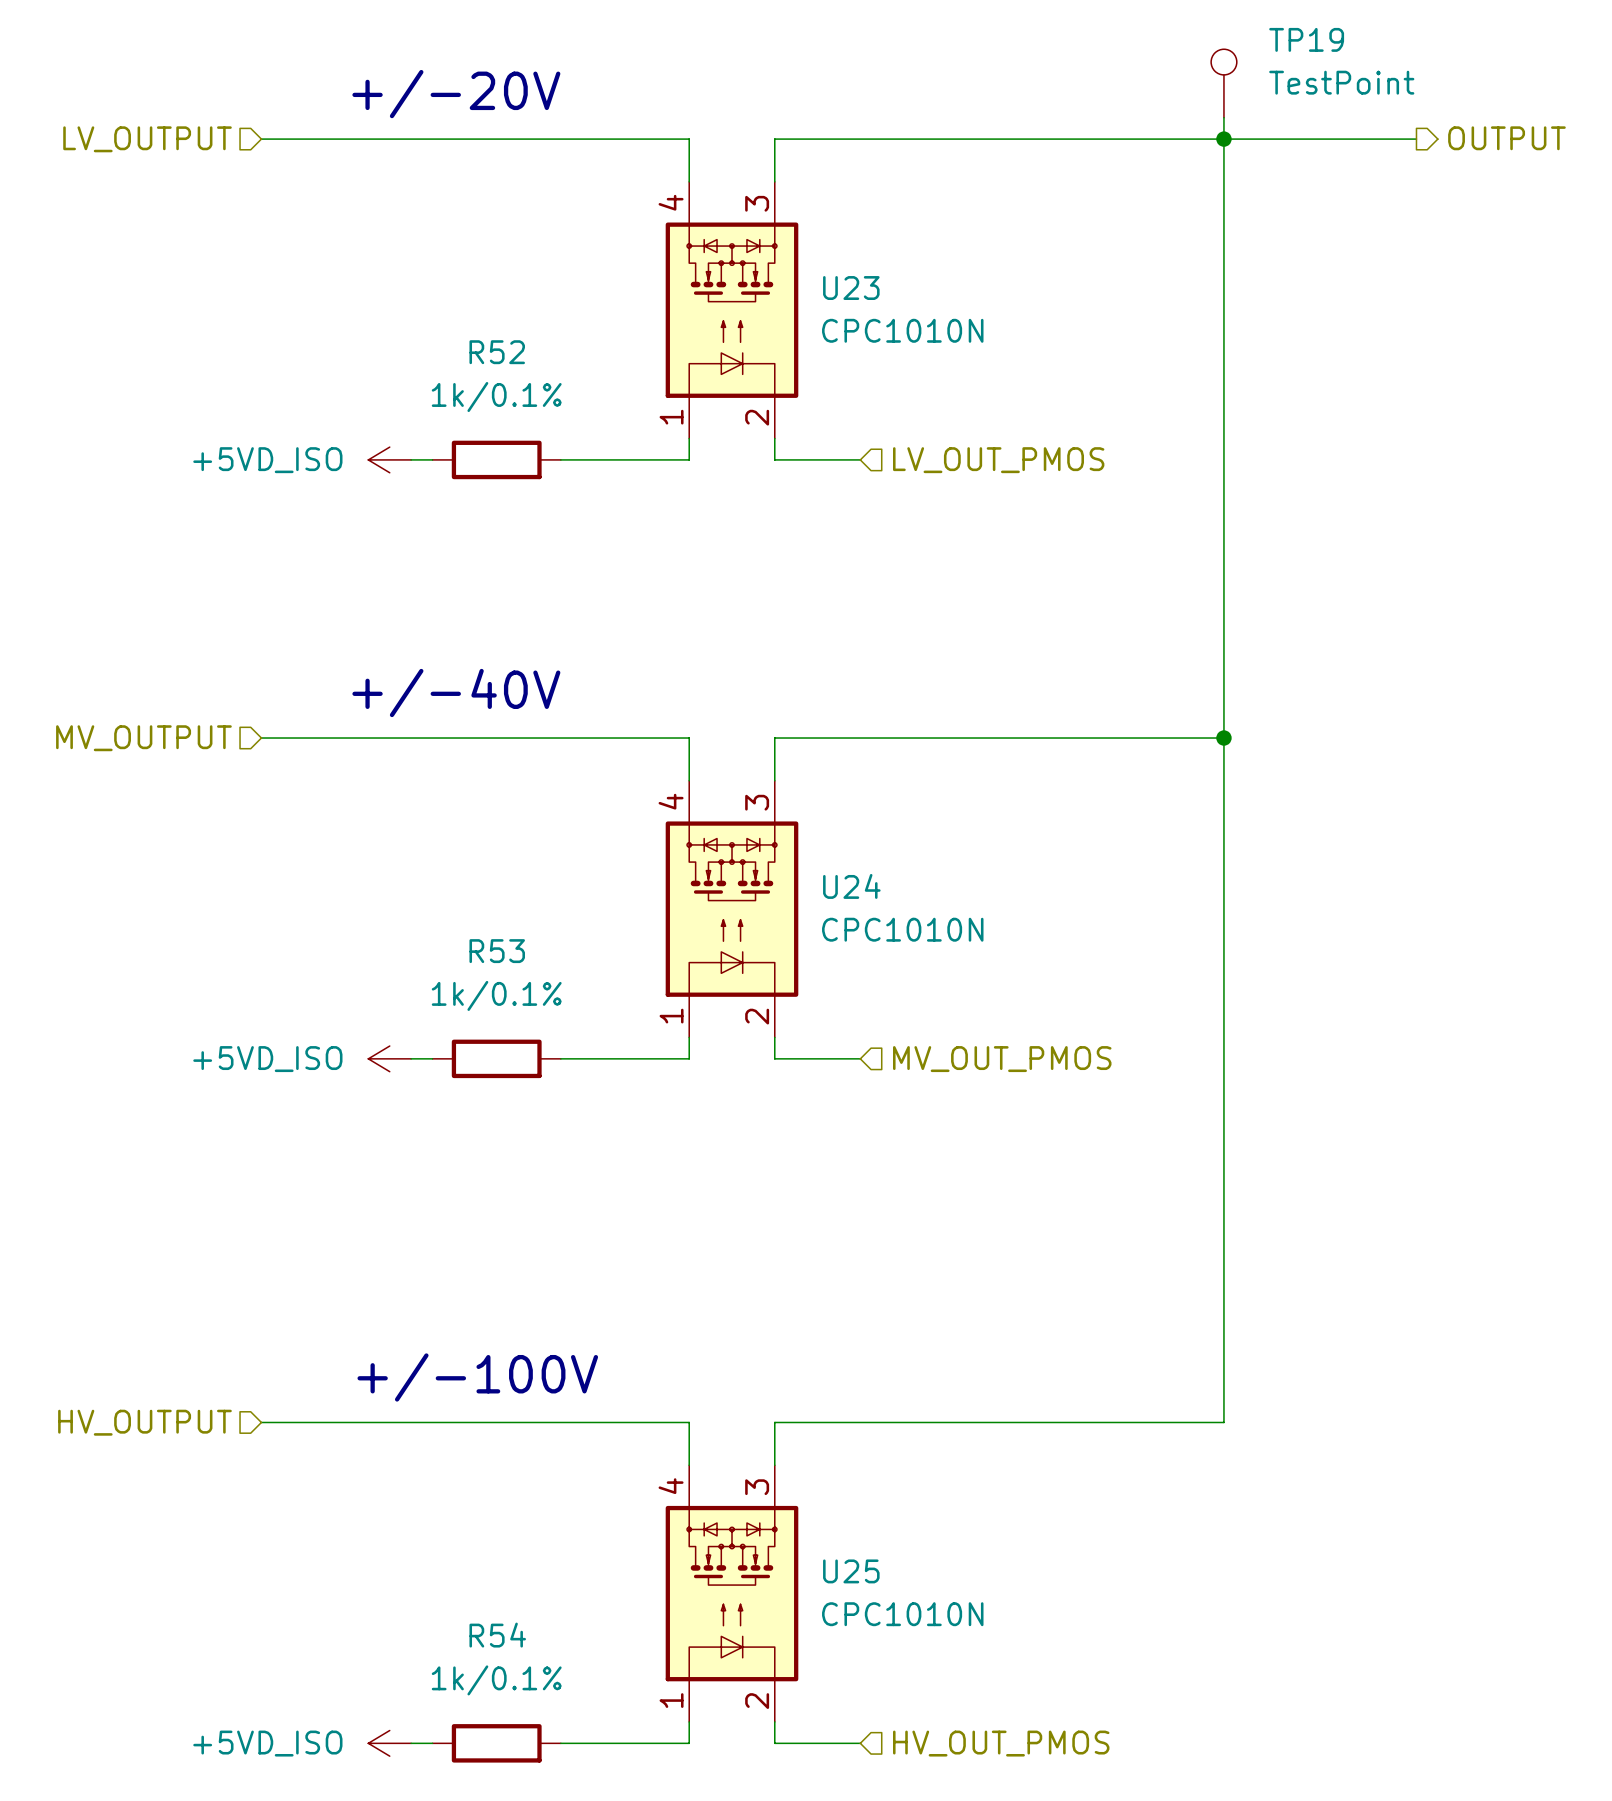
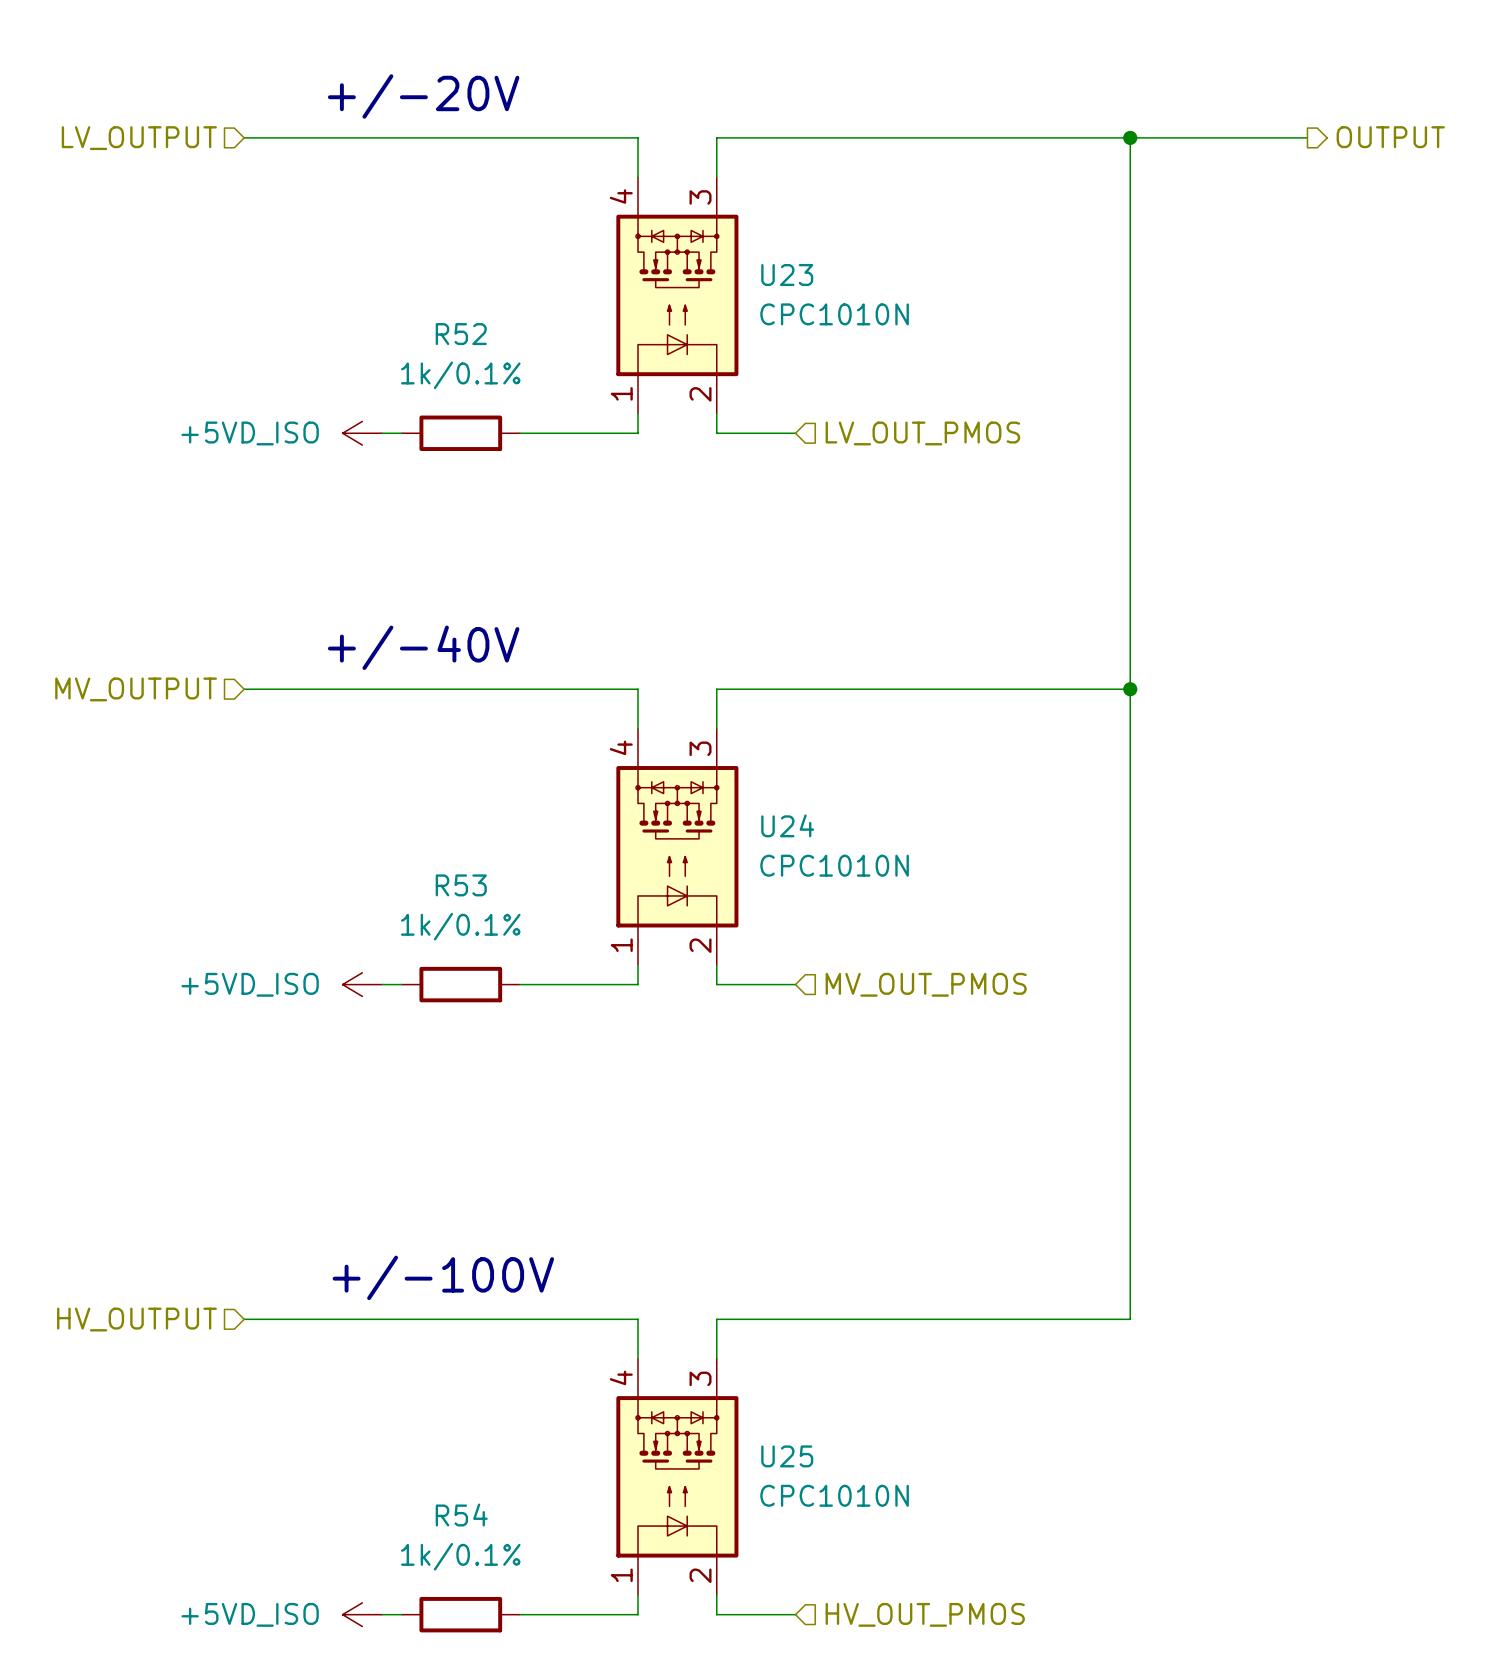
TP19: TestPoint (1223, 83) -> none
wire: (1223, 117) (1223, 139) -> none

